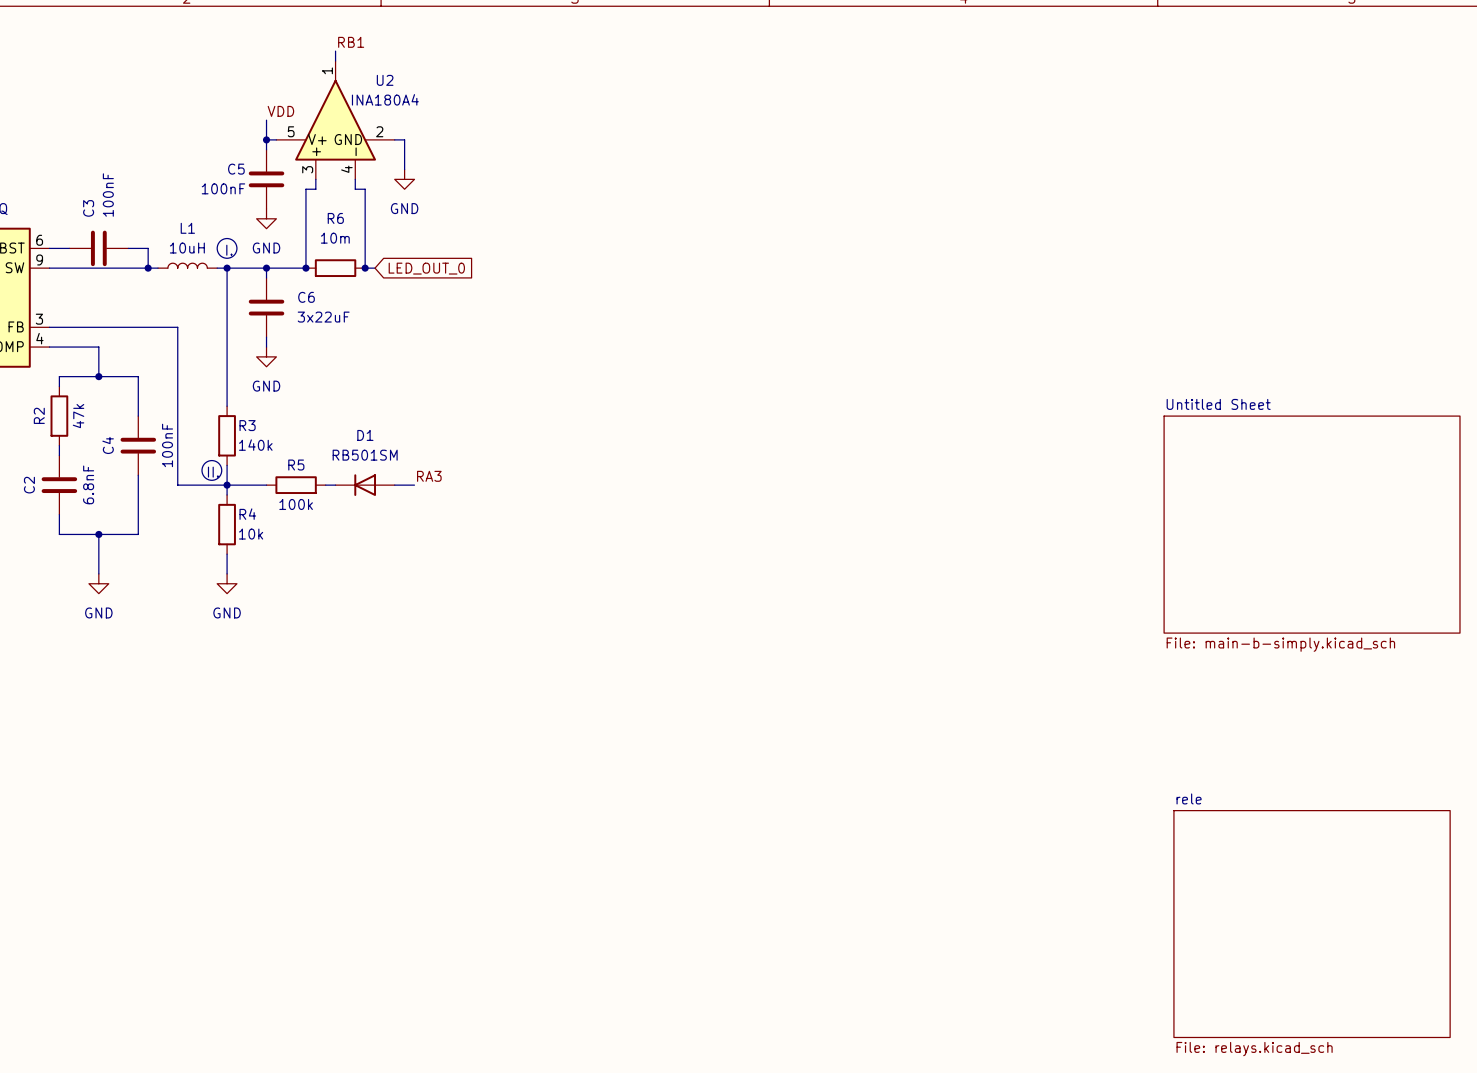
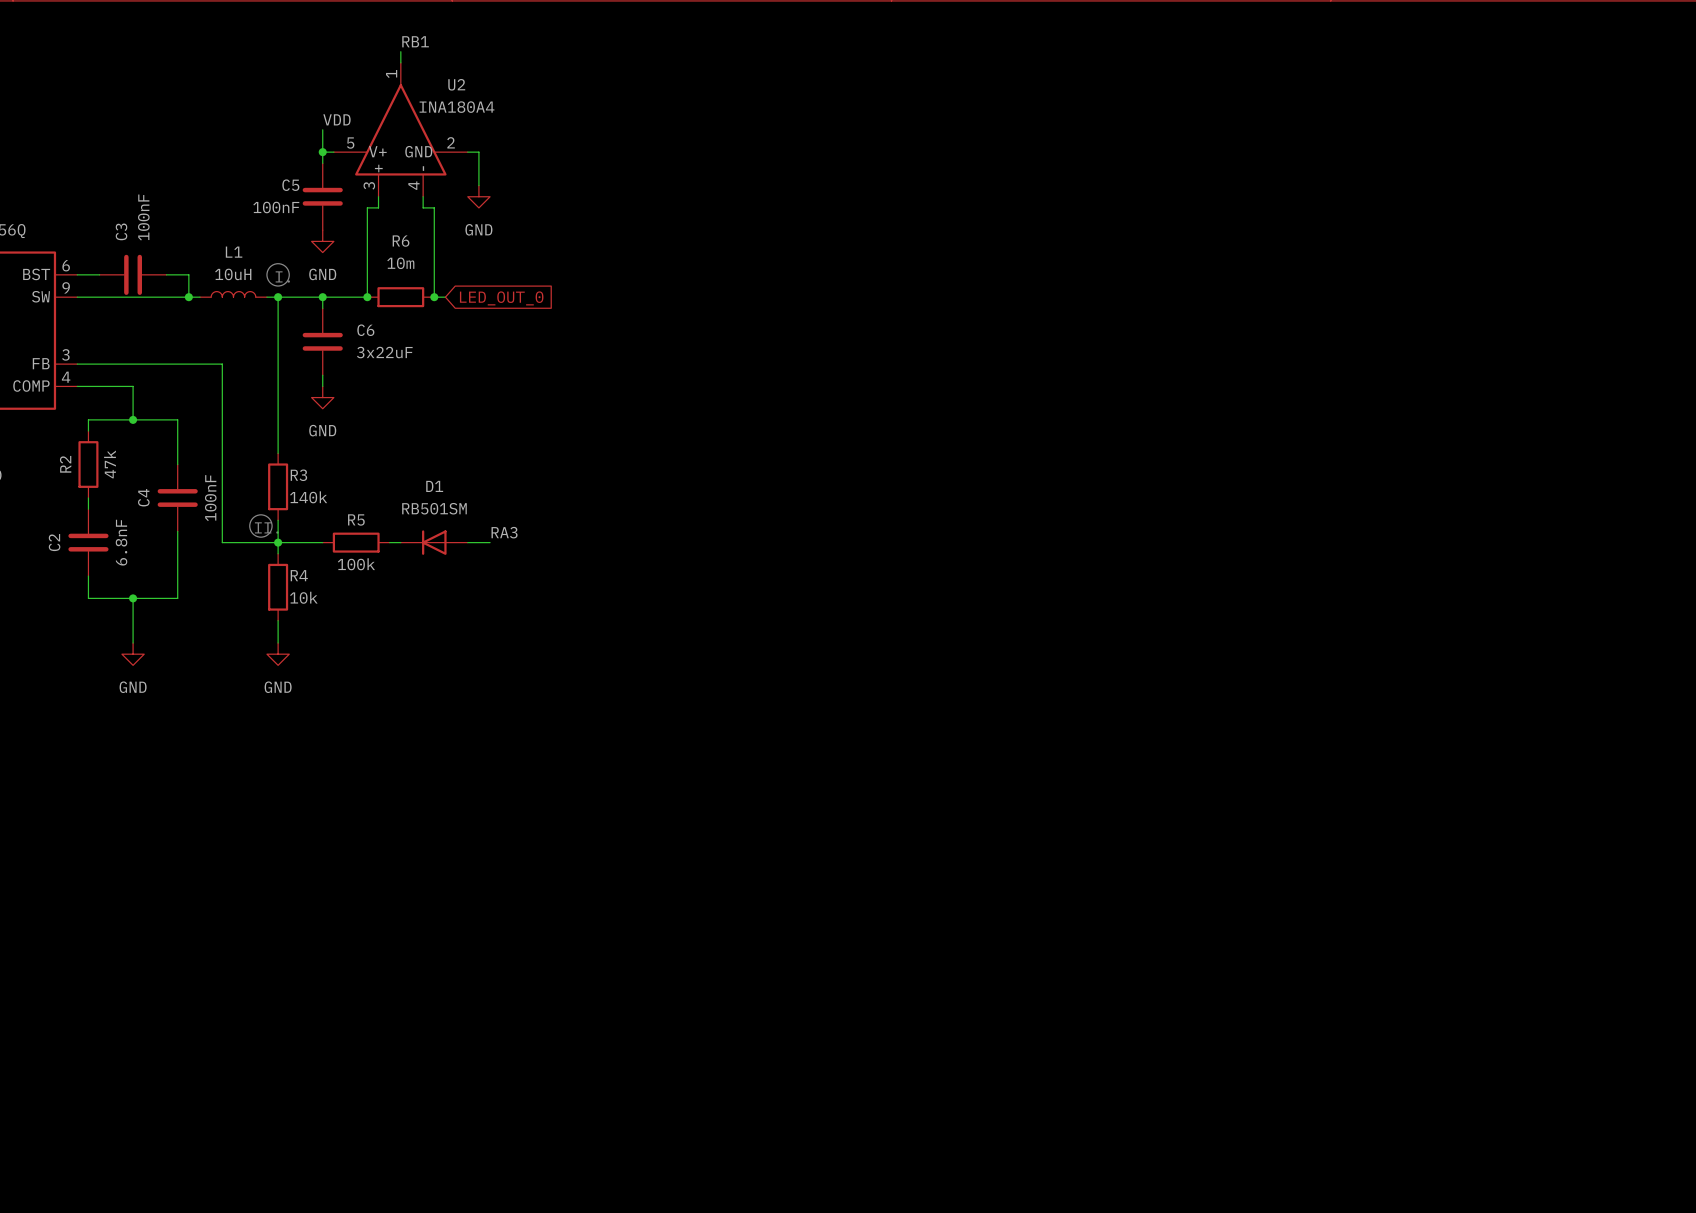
sheet Untitled Sheet: File: main-b-simply.kicad_sch (1312, 524) -> none
sheet rele: File: relays.kicad_sch (1312, 924) -> none

